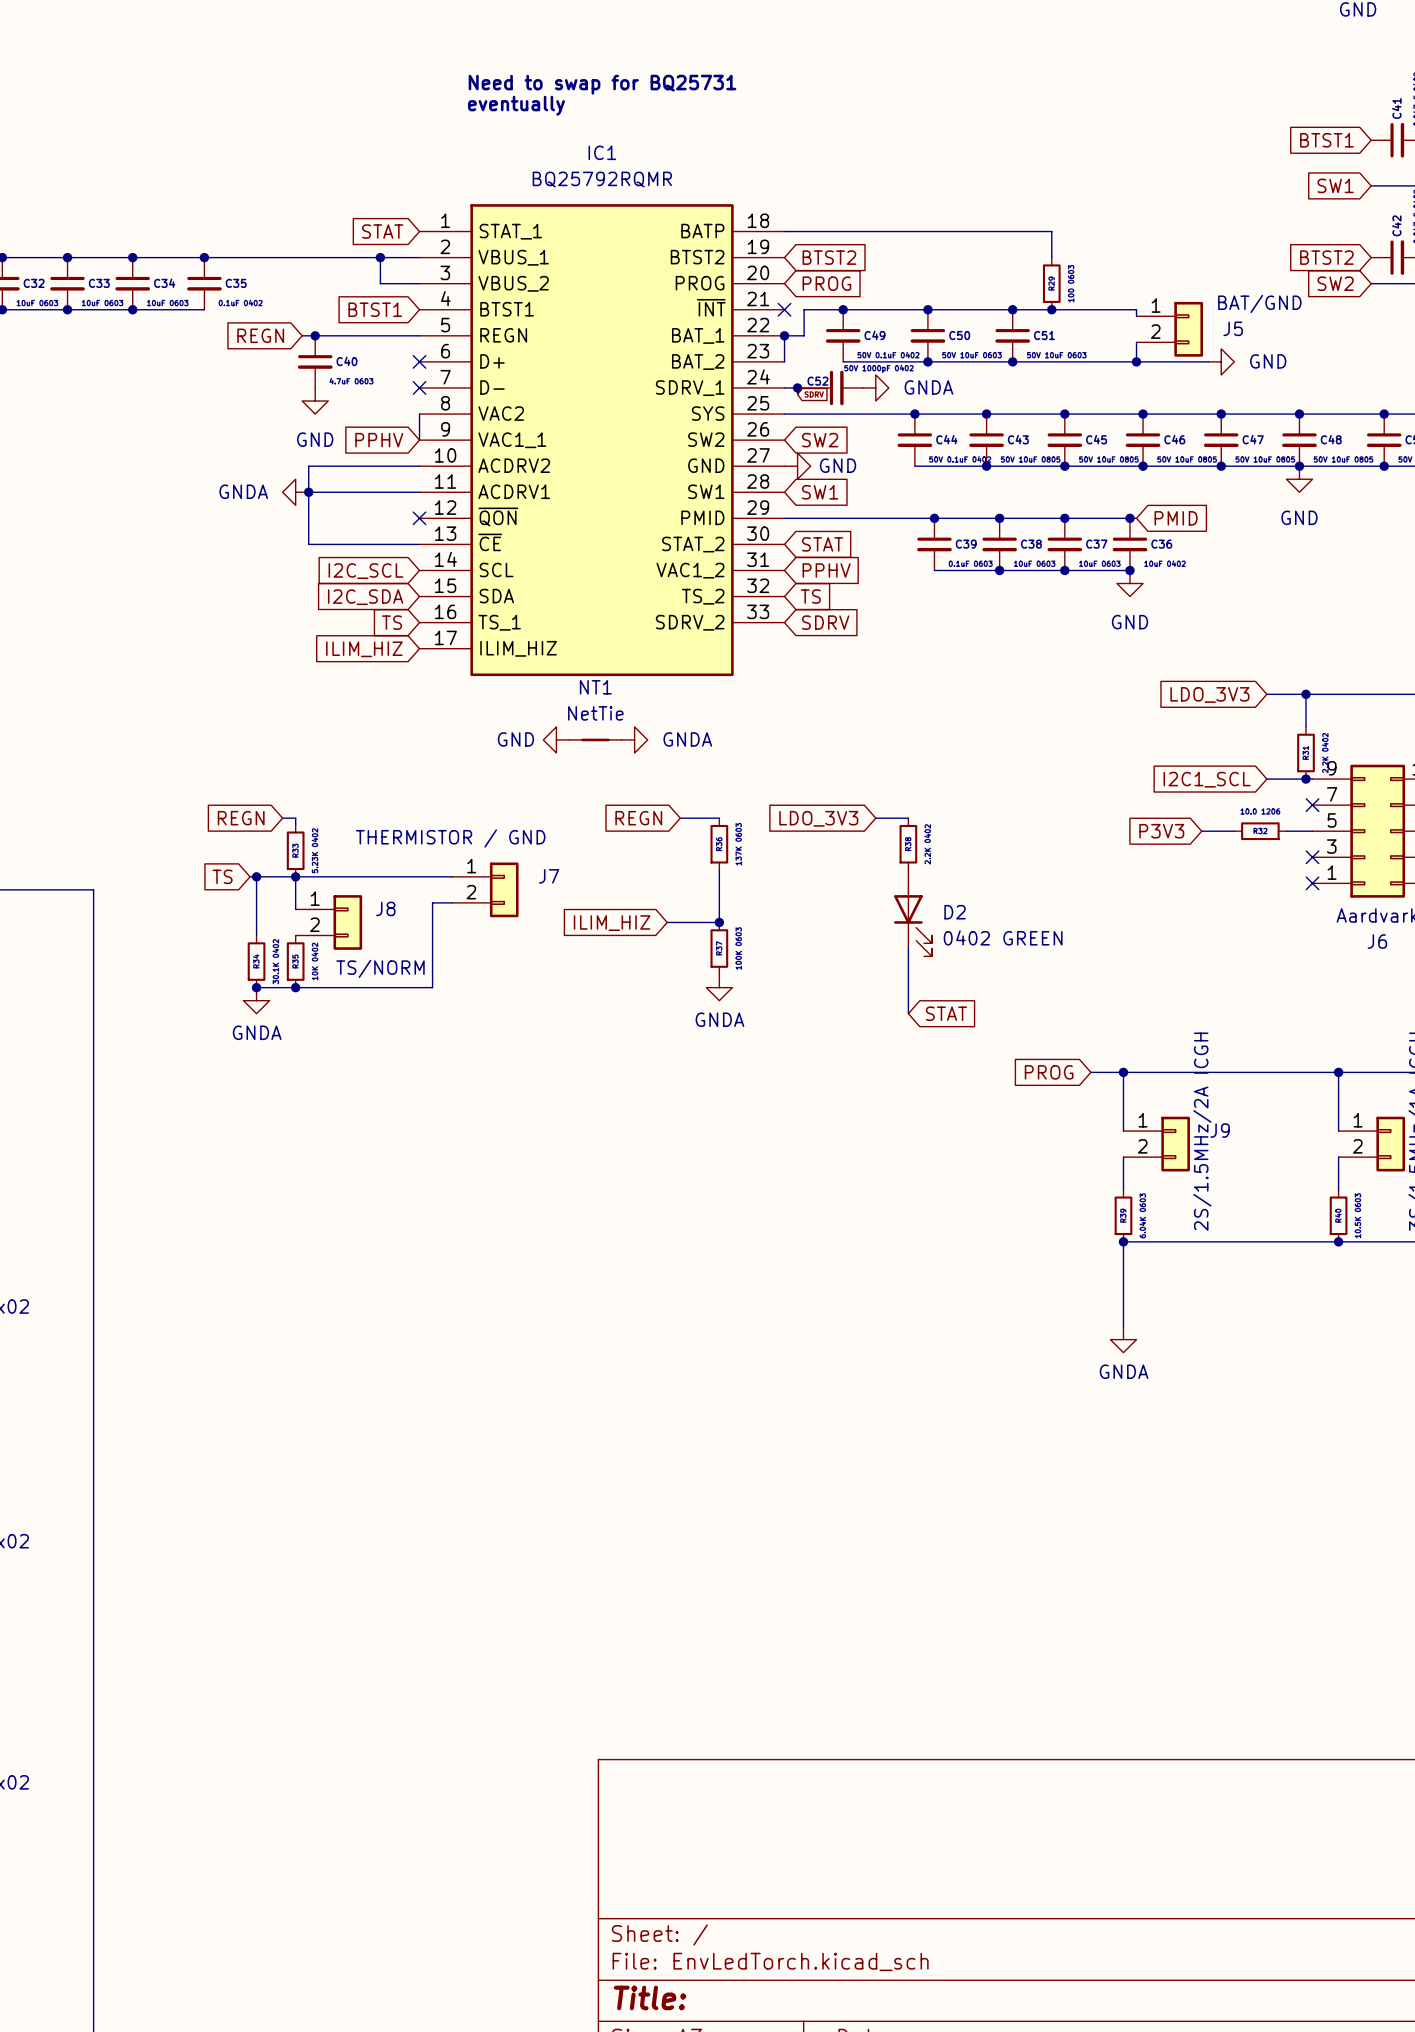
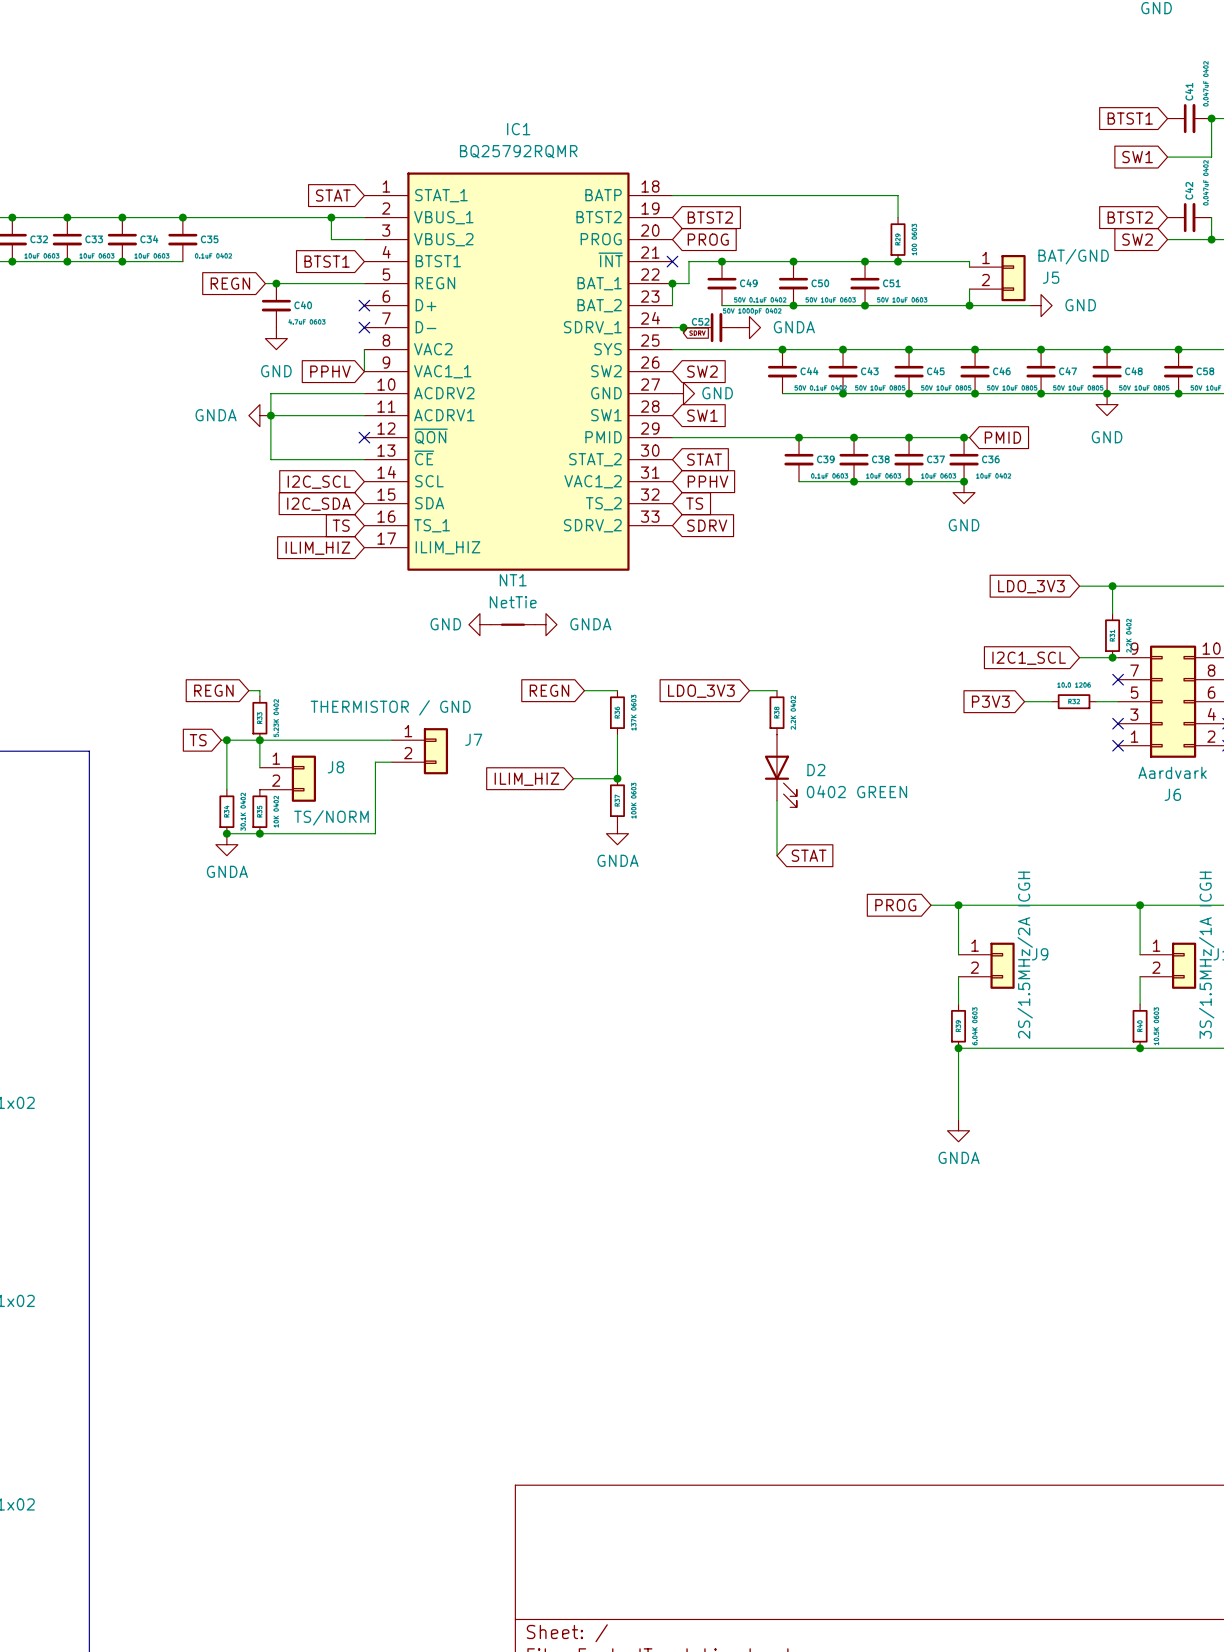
text: Need to swap for BQ25731 (602, 84) -> none
text: eventually (516, 105) -> none

